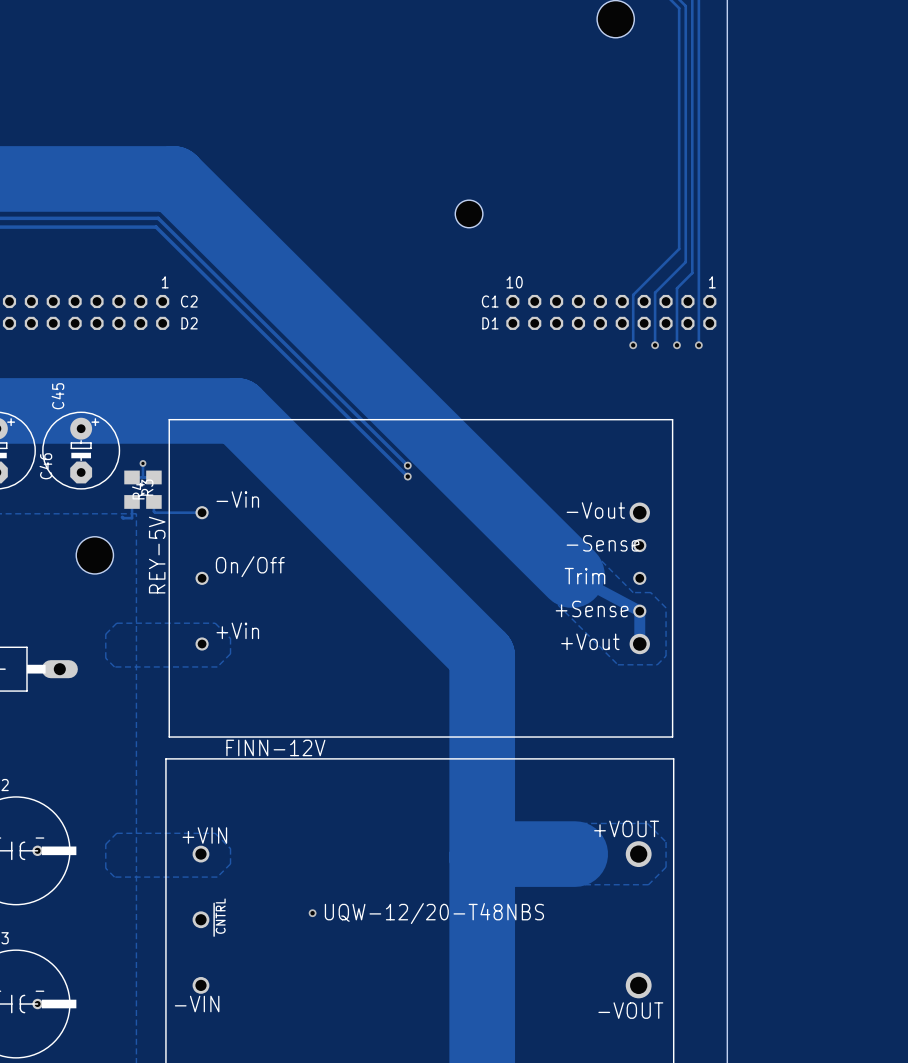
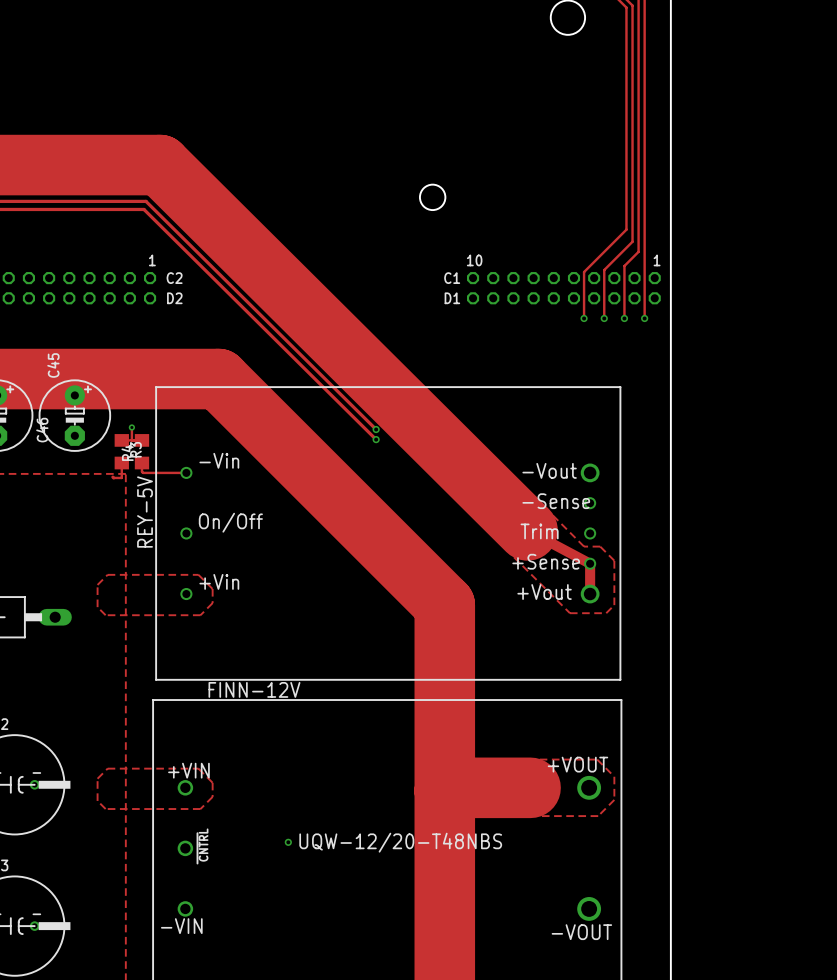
hole: (94, 555) -> none

